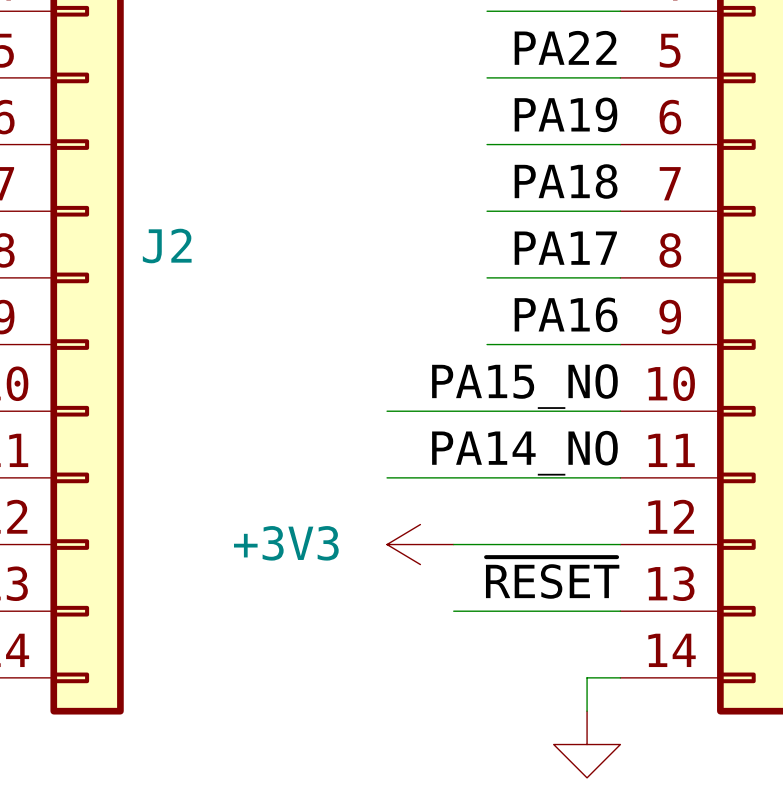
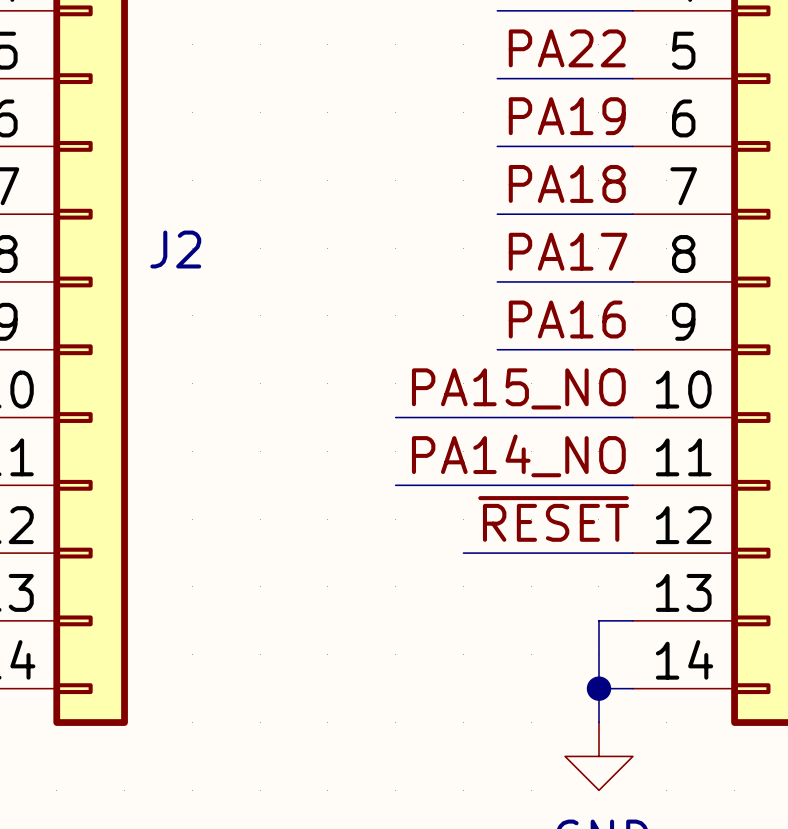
power symbol: +3V3 (420, 544) -> none
label position: ~{RESET} (552, 577) -> ~{RESET} (553, 518)
wire: (453, 611) (587, 611) -> (598, 688) (598, 620)
junction: none -> (598, 688)

